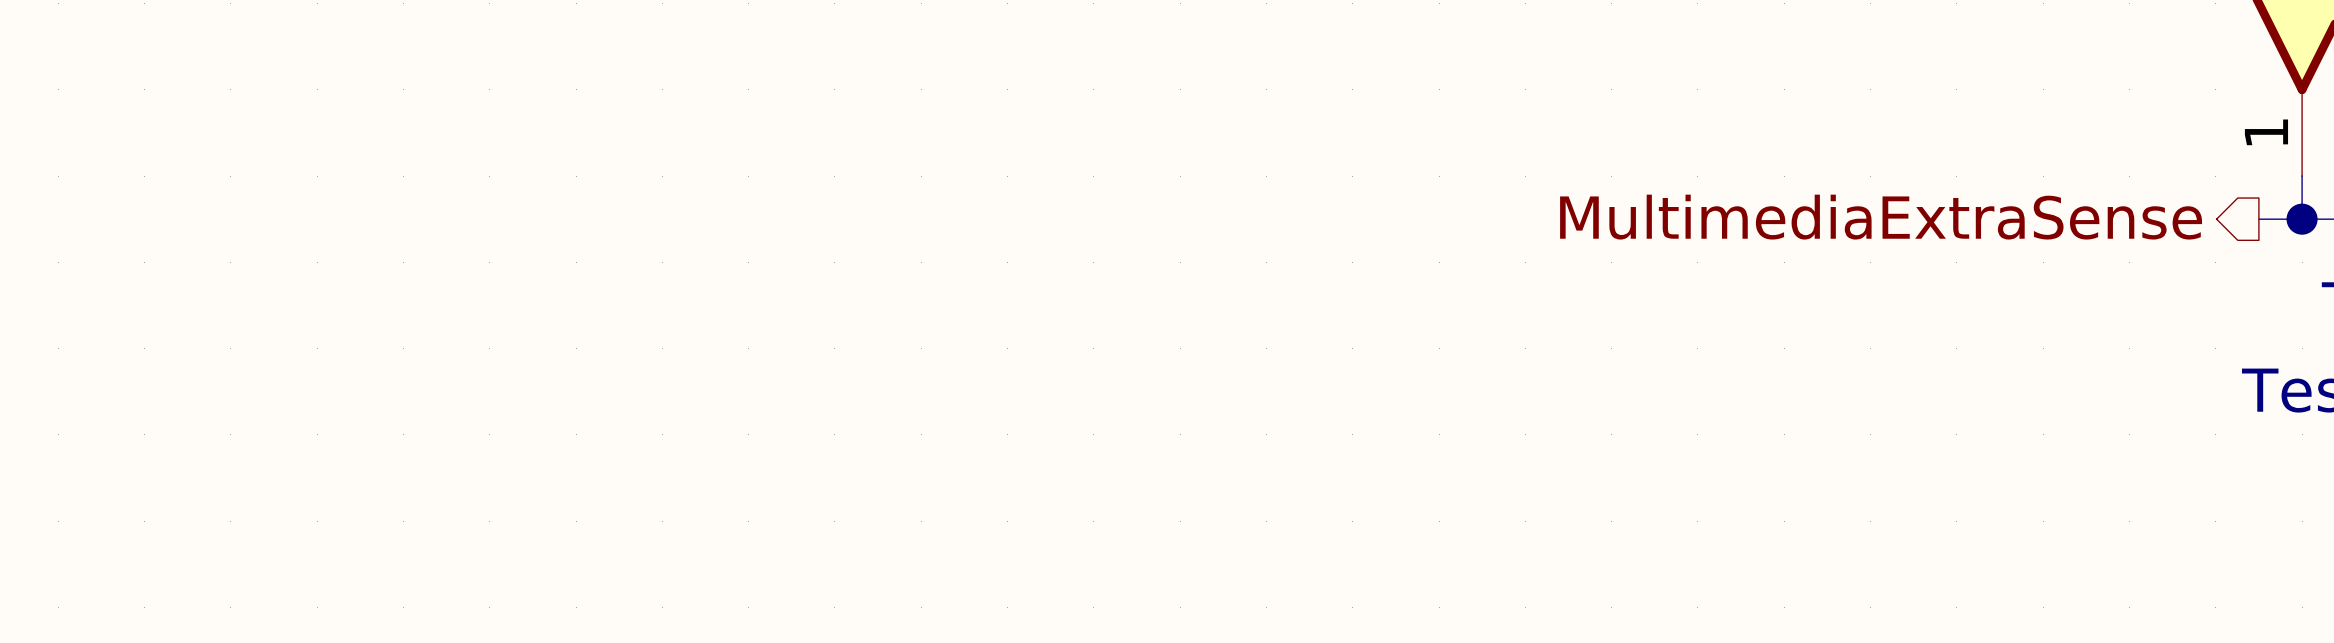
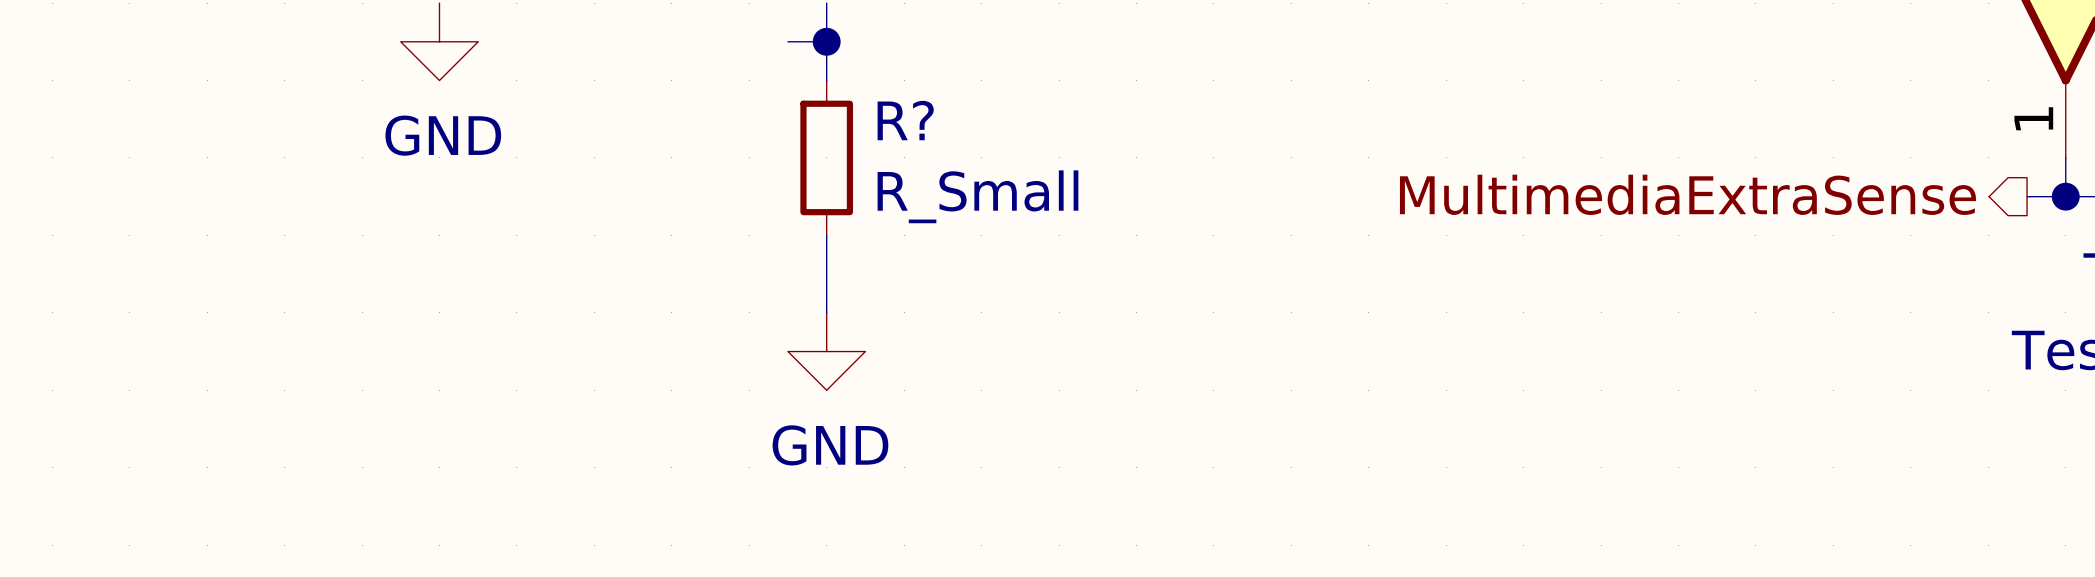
wire: none -> (826, 3) (826, 80)
power symbol: none -> GND (439, 41)
wire: none -> (787, 41) (826, 41)
junction: none -> (826, 41)
R?: none -> R_Small (826, 157)
wire: none -> (826, 235) (826, 312)
power symbol: none -> GND (826, 351)

